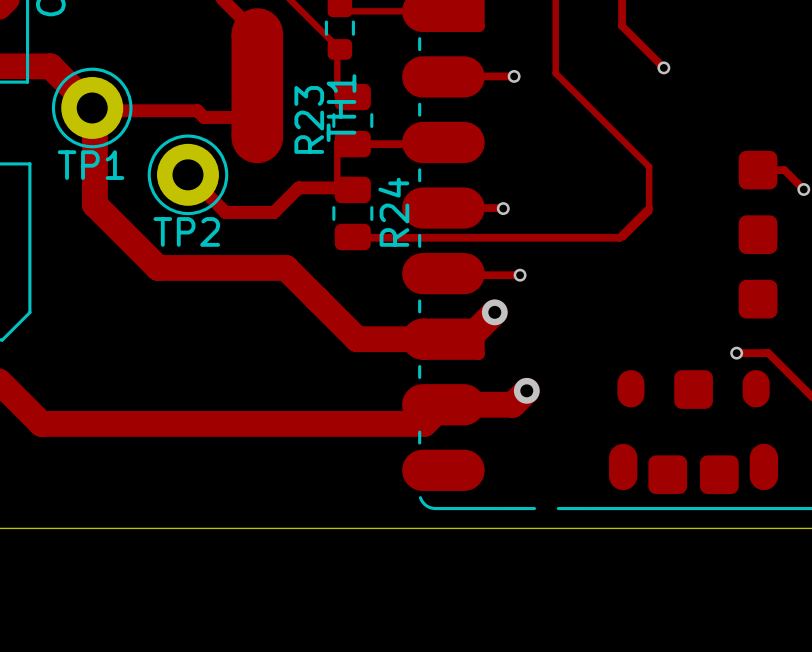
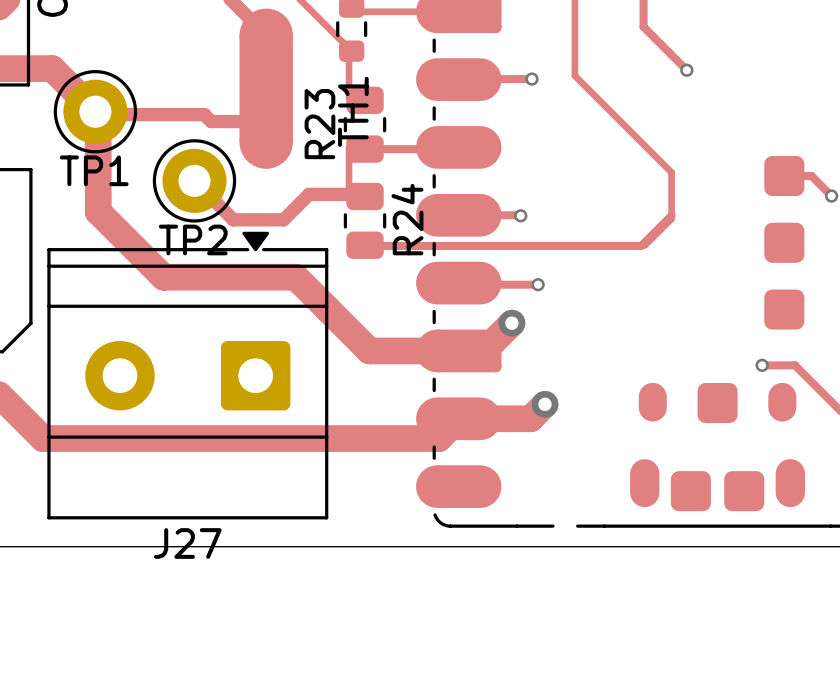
J27: none -> (187, 375)

